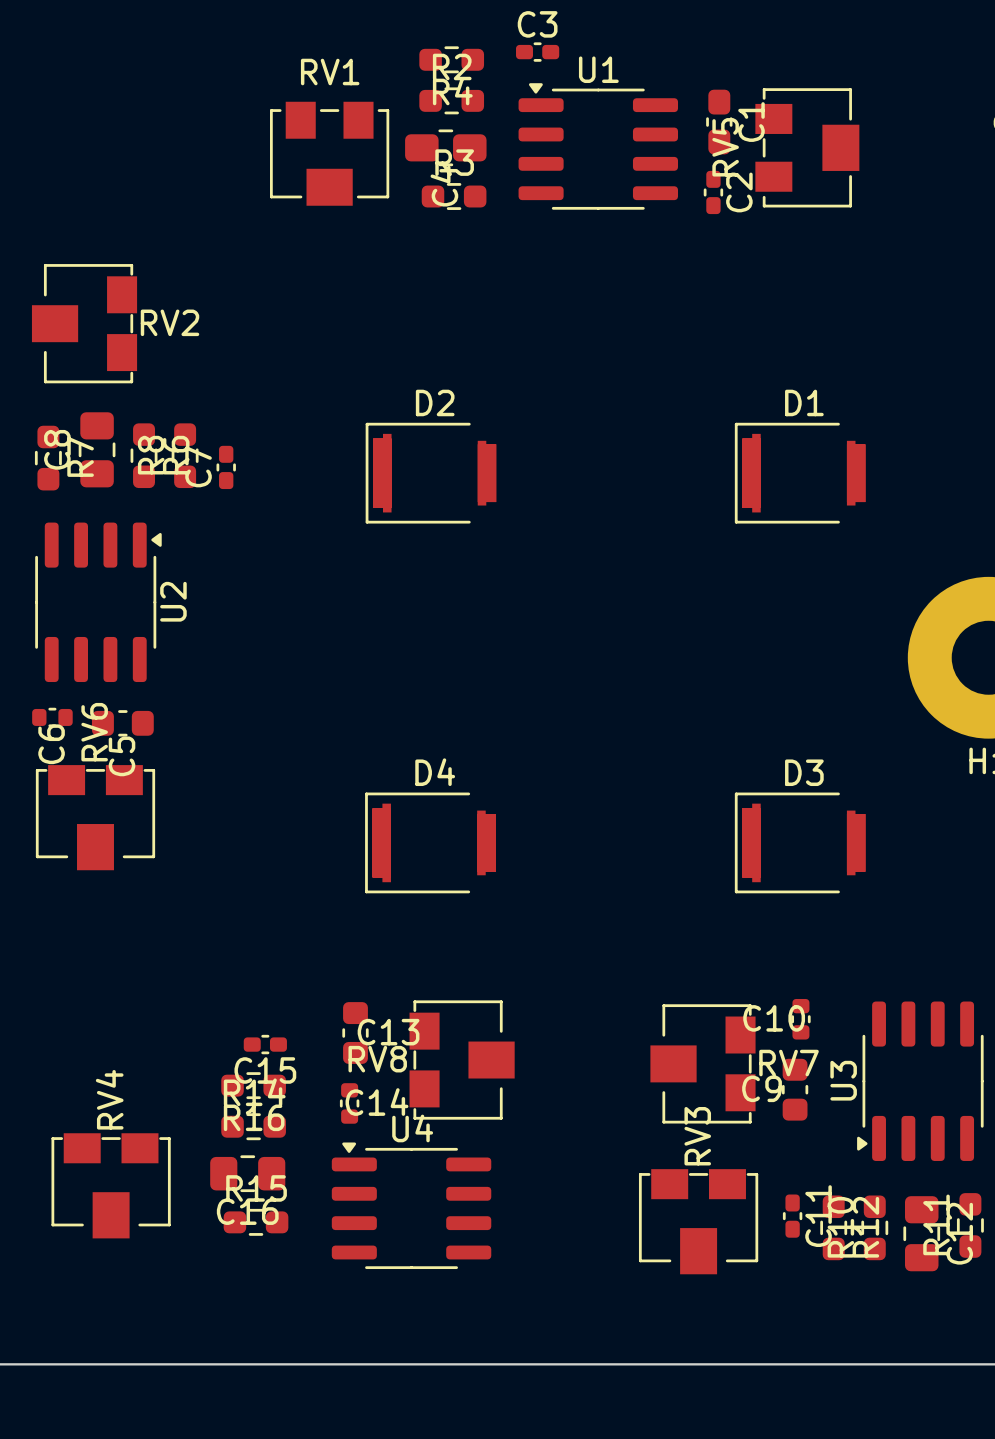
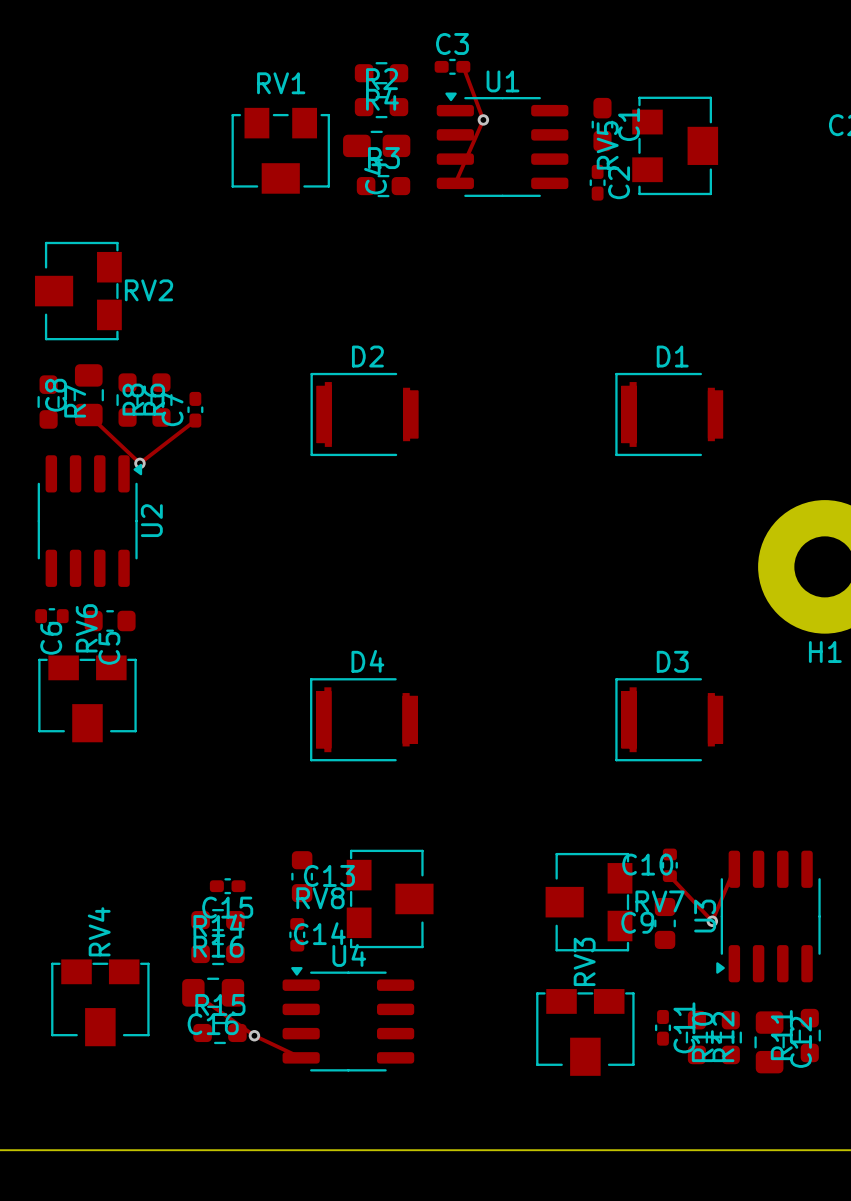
top track: none -> (463, 66) (483, 119) (455, 183)
via: none -> (483, 119)
top track: none -> (88, 415) (139, 463) (195, 420)
via: none -> (139, 463)
top track: none -> (734, 869) (712, 921) (669, 876)
via: none -> (712, 921)
top track: none -> (193, 992) (254, 1035) (301, 1057)
via: none -> (254, 1035)

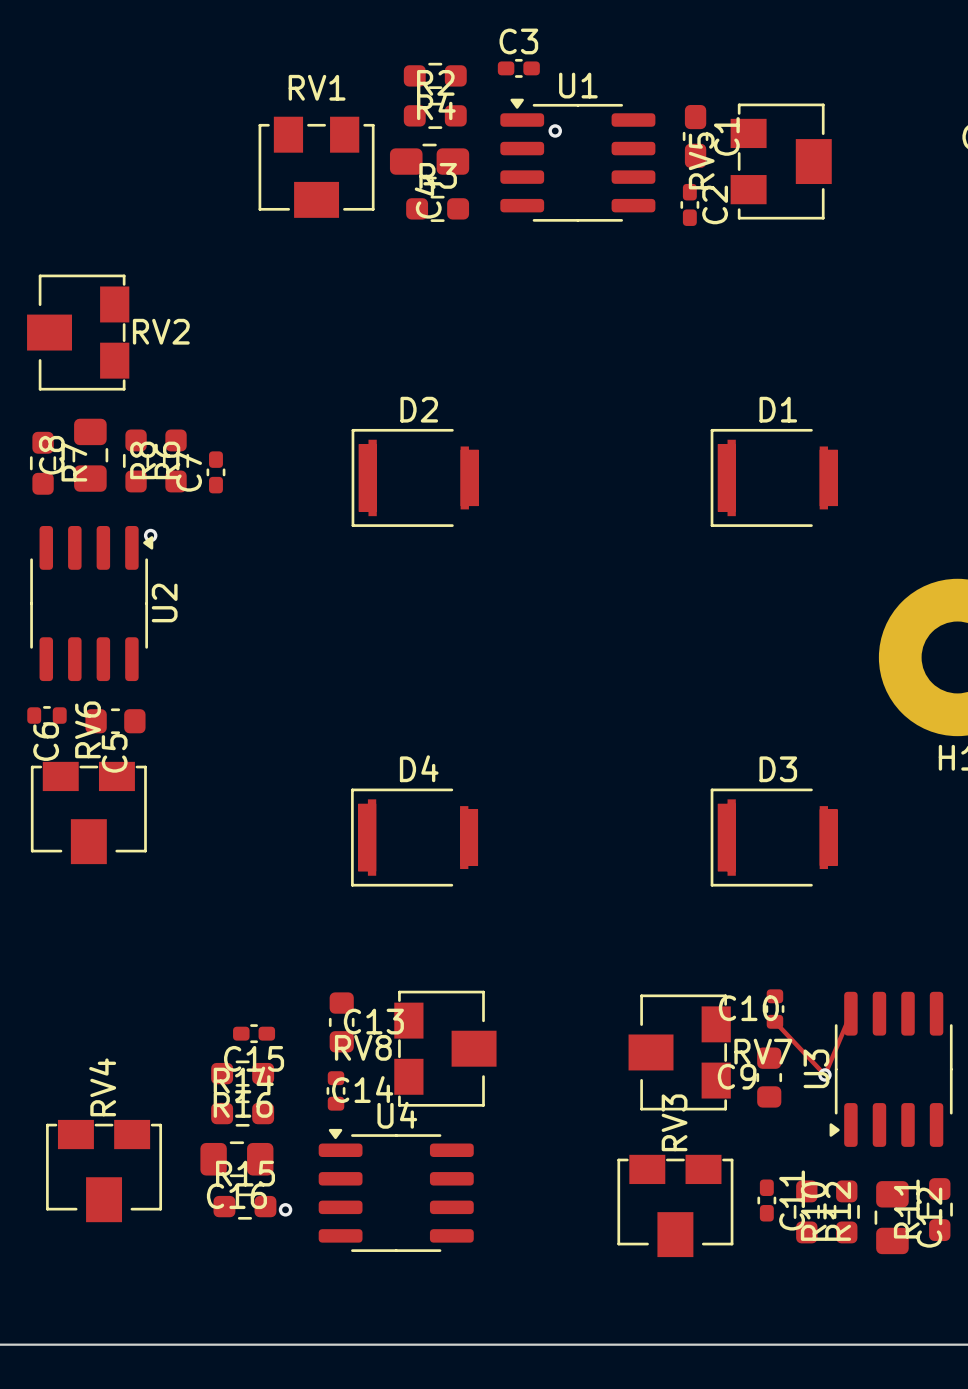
top track: (463, 66) (483, 119) (455, 183) -> none
top track: (88, 415) (139, 463) (195, 420) -> none
top track: (193, 992) (254, 1035) (301, 1057) -> none

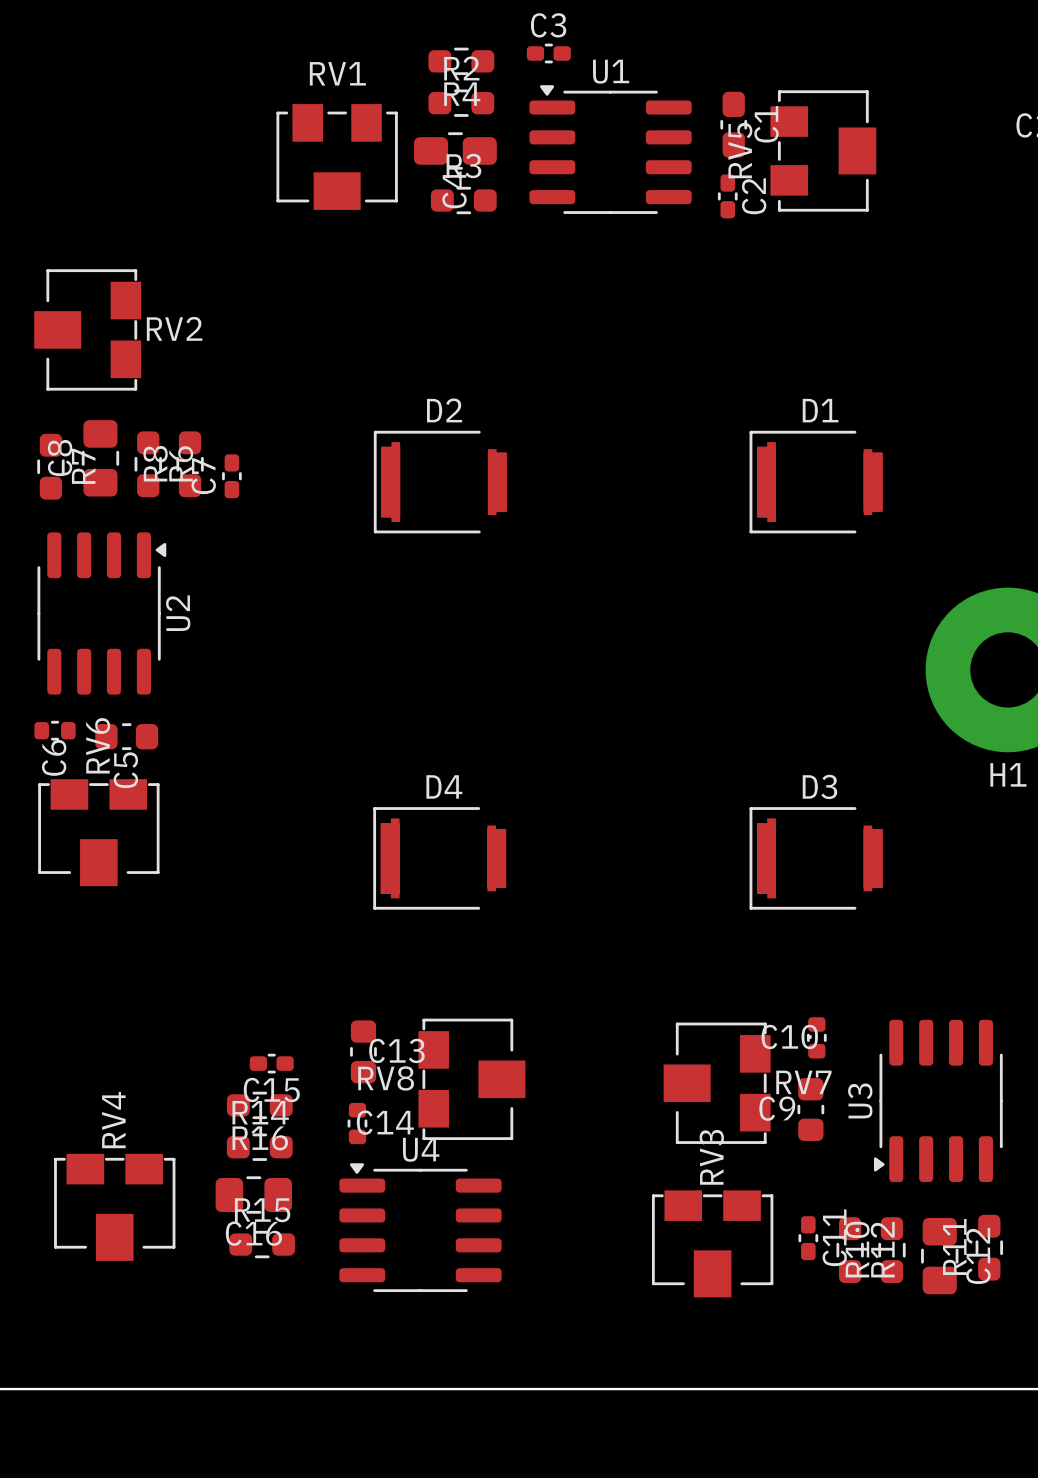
via: (555, 130) -> none
via: (150, 535) -> none
top track: (850, 1013) (824, 1074) (774, 1021) -> none
via: (824, 1074) -> none
via: (285, 1209) -> none

